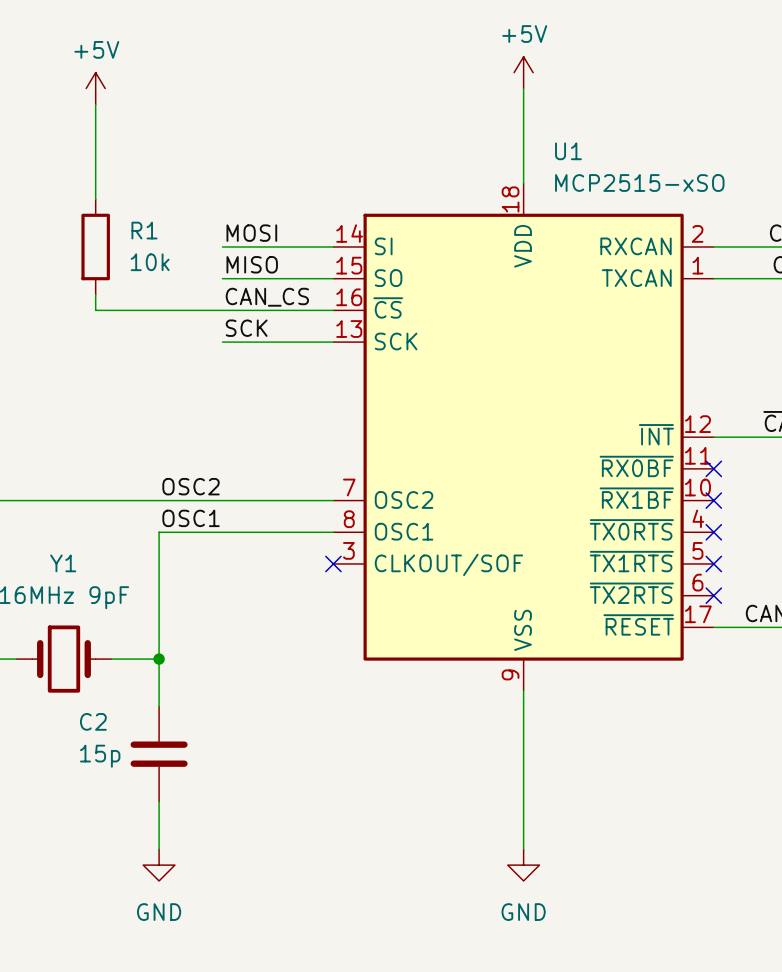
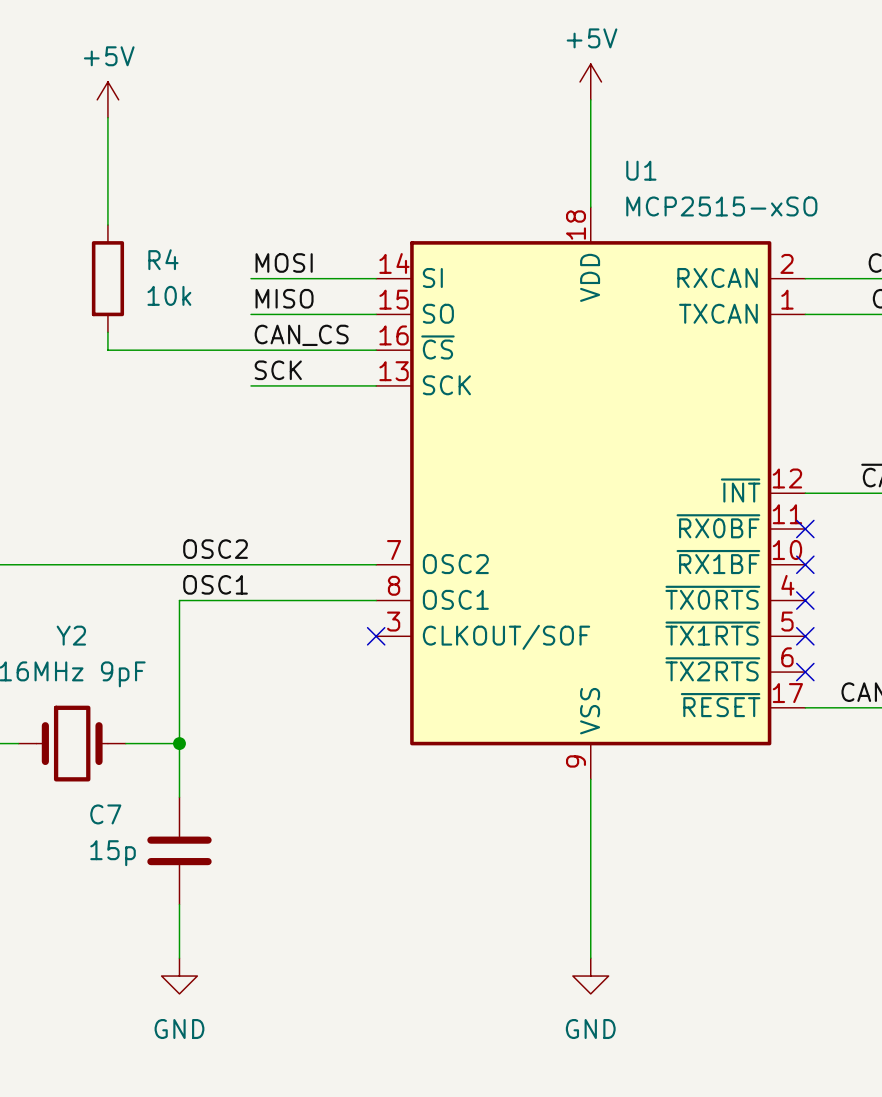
R1 name: R1 (144, 230) -> R4 (163, 259)
Y1 name: Y1 (63, 563) -> Y2 (71, 635)
C2 name: C2 (93, 721) -> C7 (105, 814)

